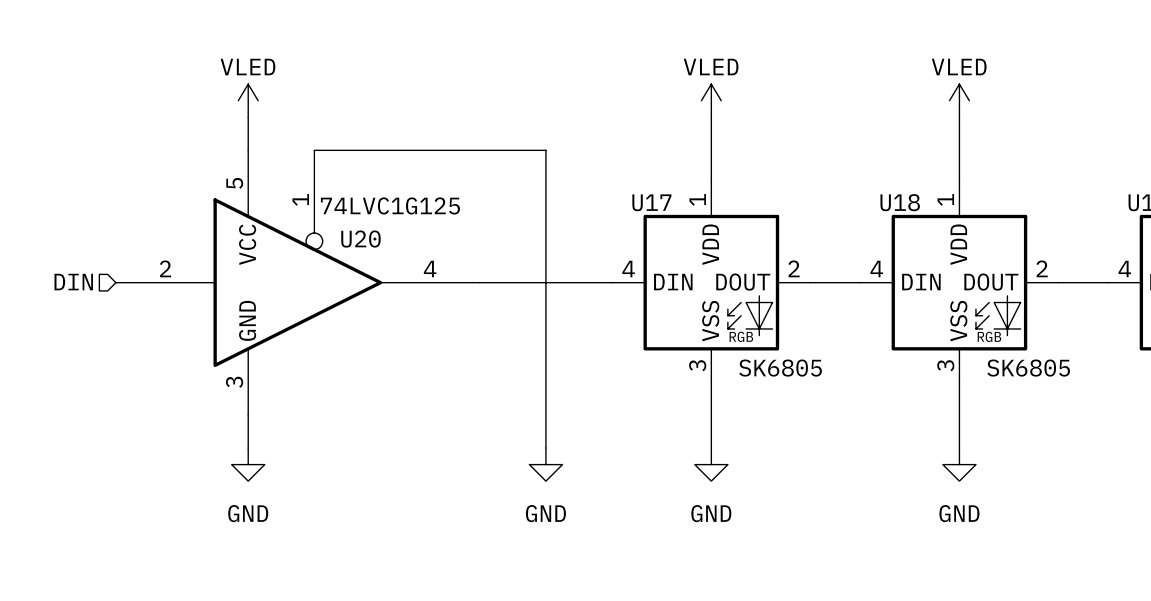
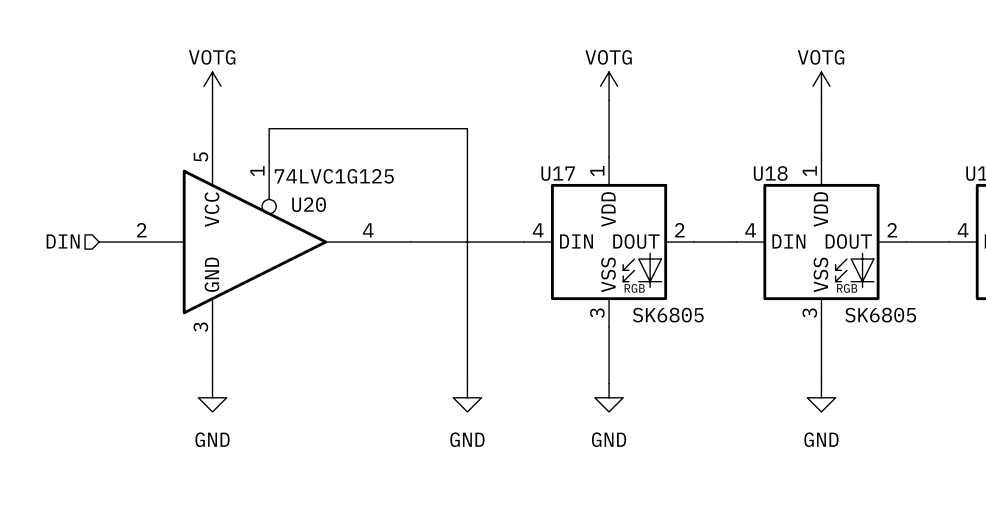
power symbol: VLED (248, 100) -> VOTG (212, 86)
power symbol: VLED (711, 100) -> VOTG (609, 86)
power symbol: VLED (959, 100) -> VOTG (821, 86)

